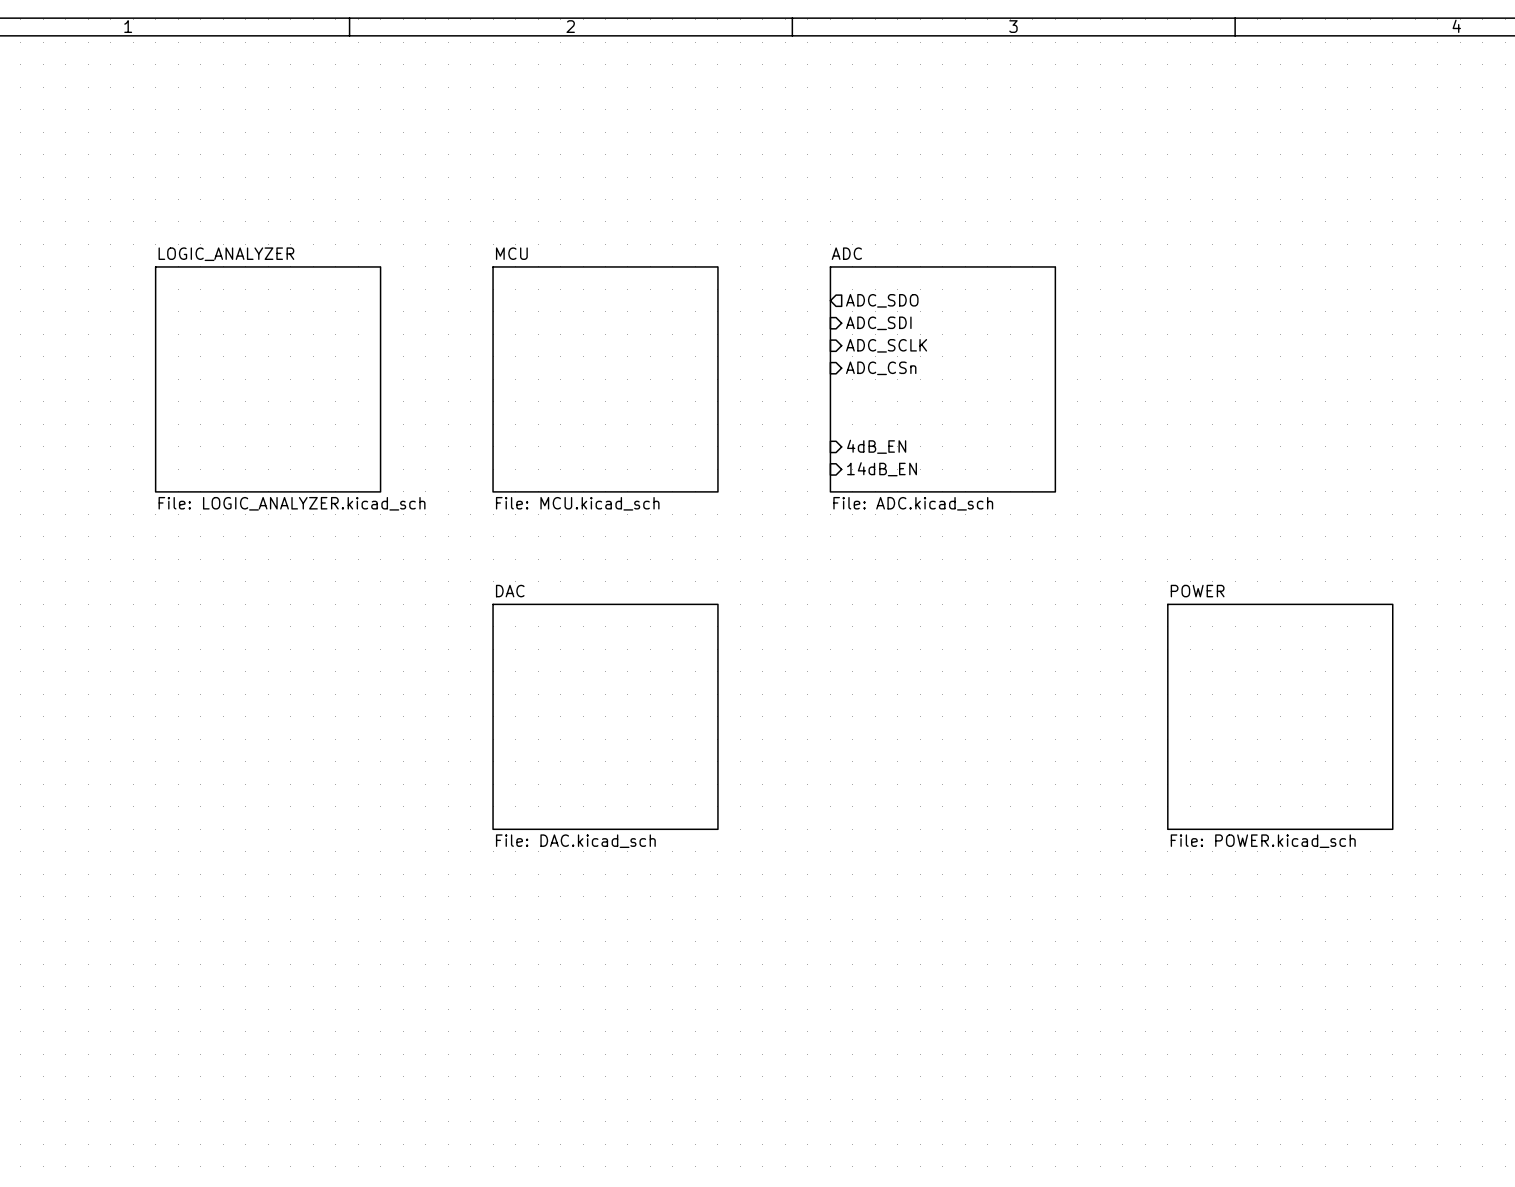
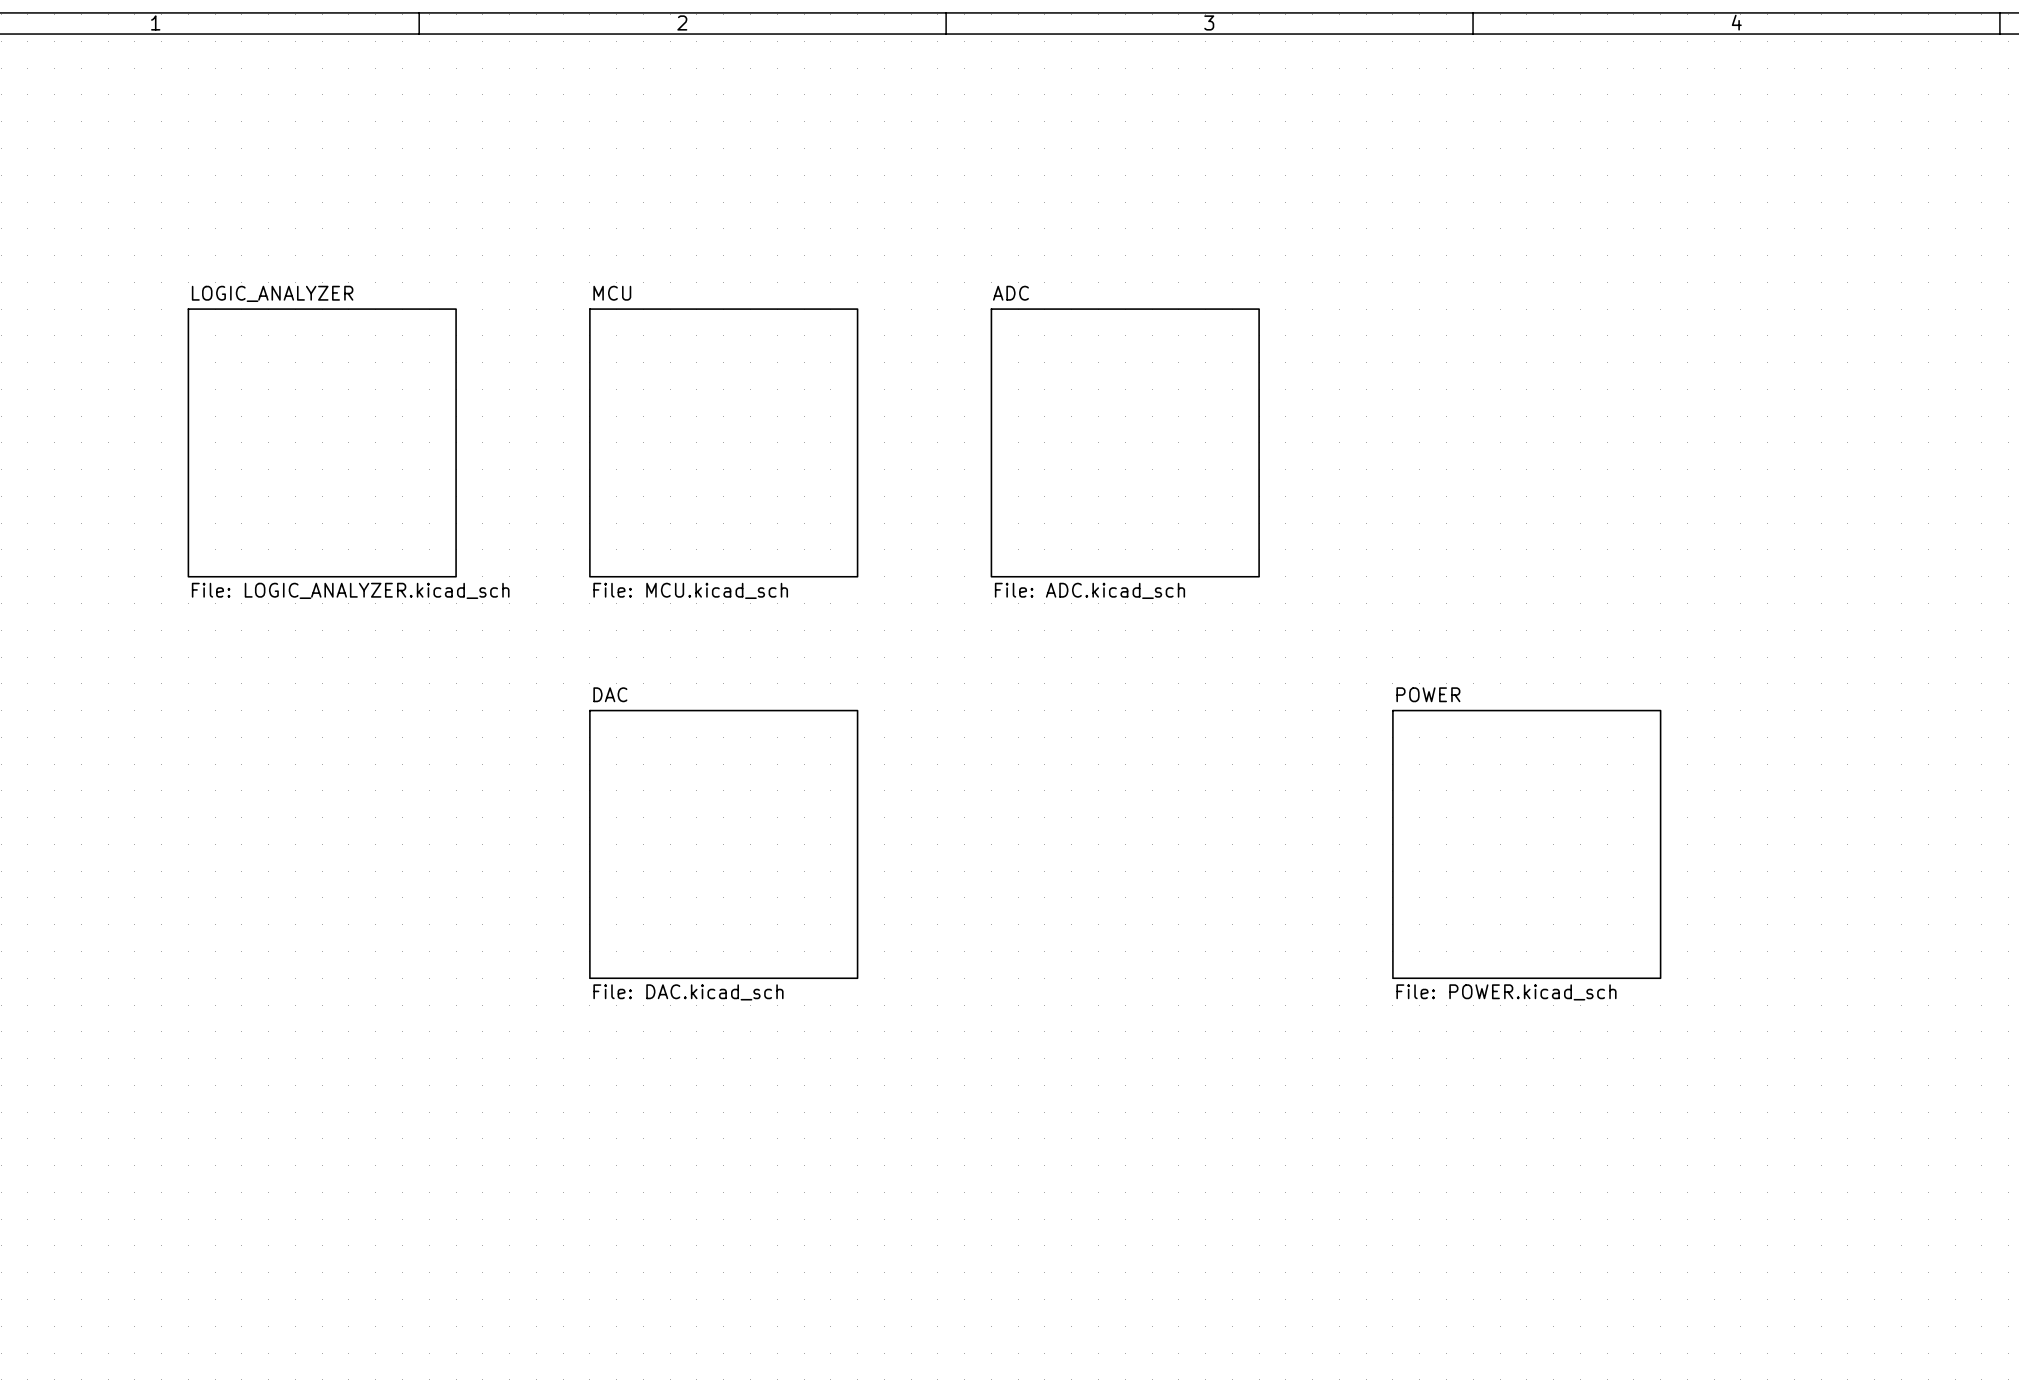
sheet pin: ADC_SDO (882, 300) -> none
sheet pin: ADC_SDI (878, 323) -> none
sheet pin: ADC_SCLK (886, 345) -> none
sheet pin: ADC_CSn (881, 368) -> none
sheet pin: 4dB_EN (876, 446) -> none
sheet pin: 14dB_EN (882, 469) -> none

